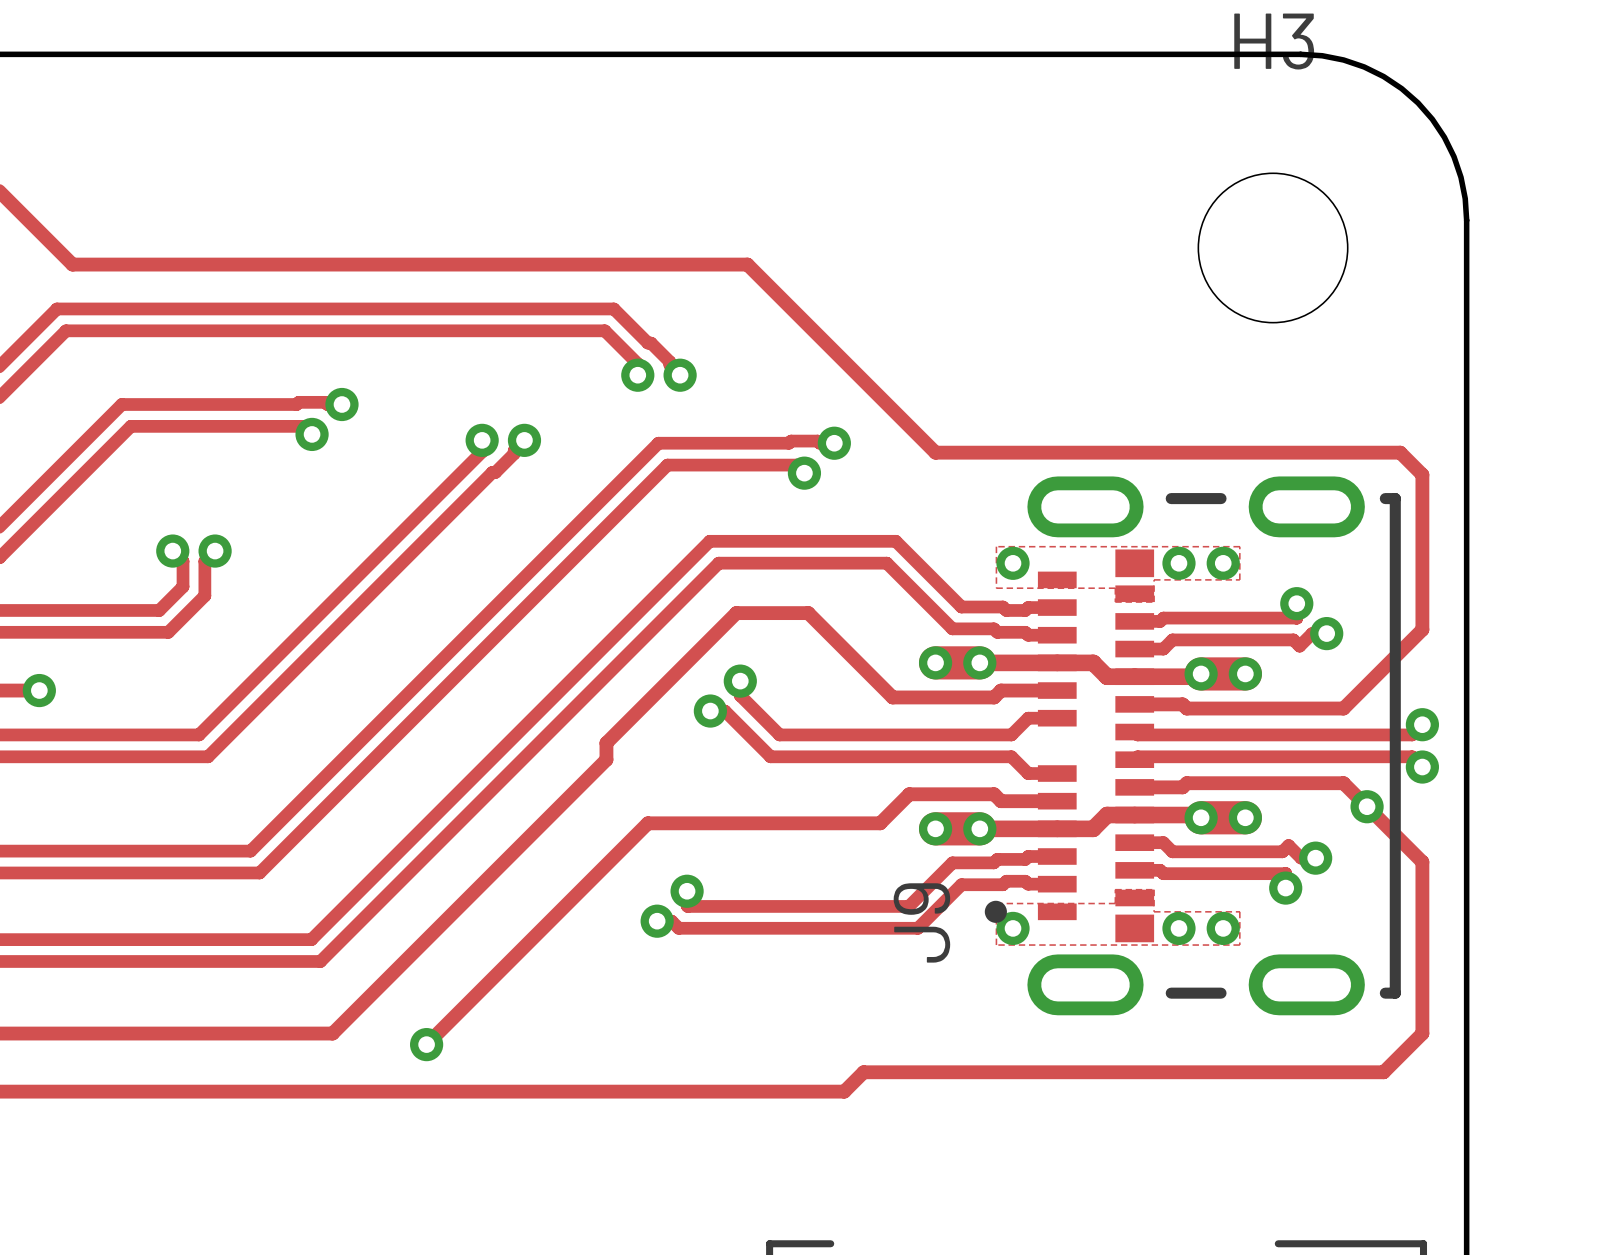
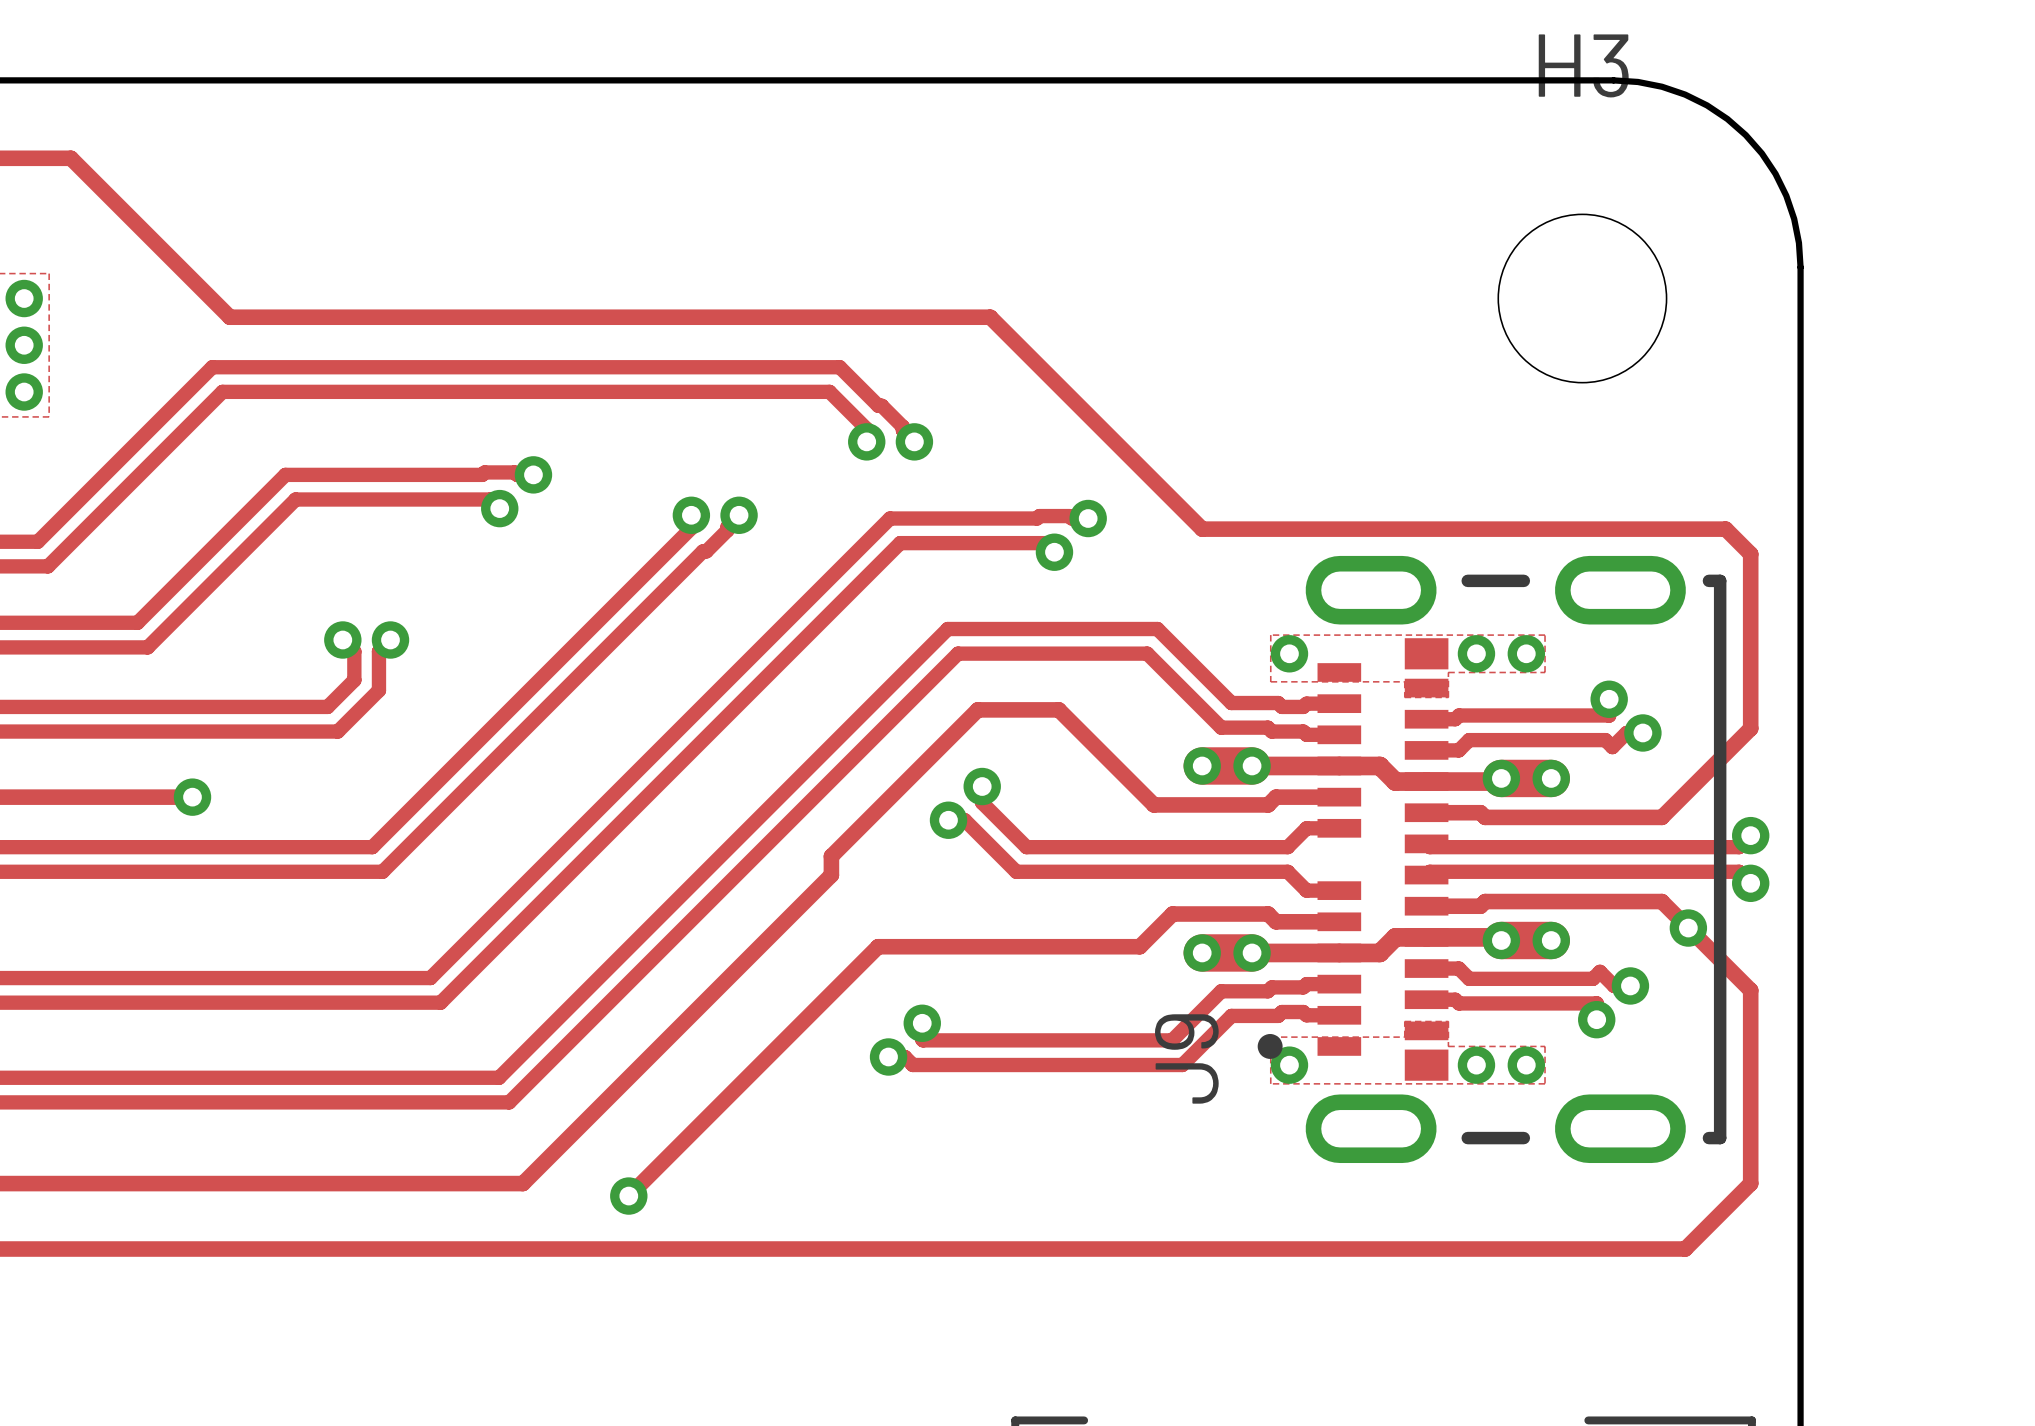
track: (1383, 1072) (863, 1072) (844, 1091) -> (1707, 1227) (1685, 1249) (1099, 1249)

